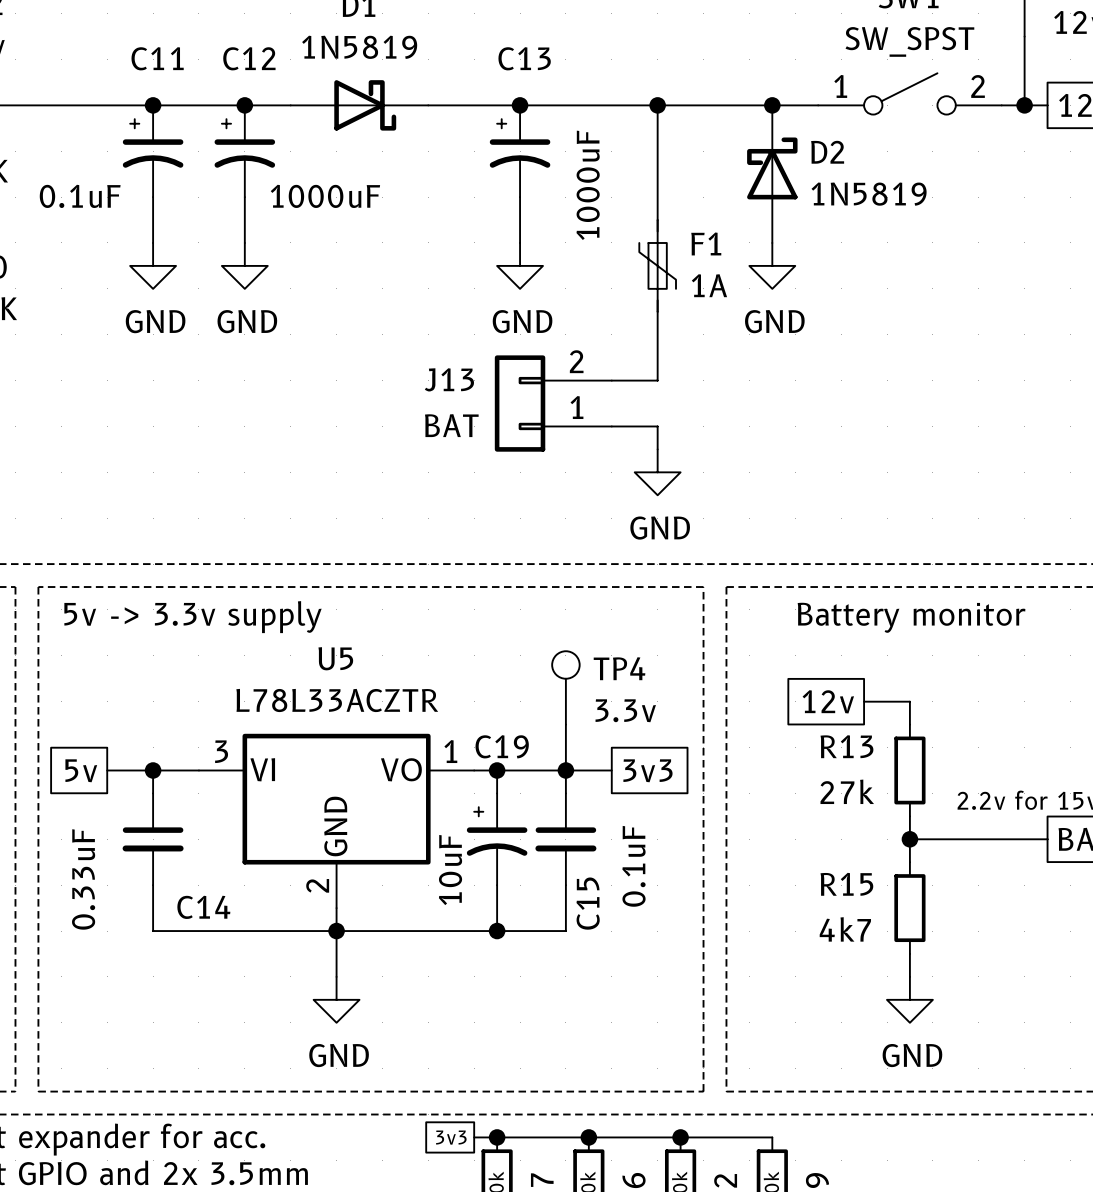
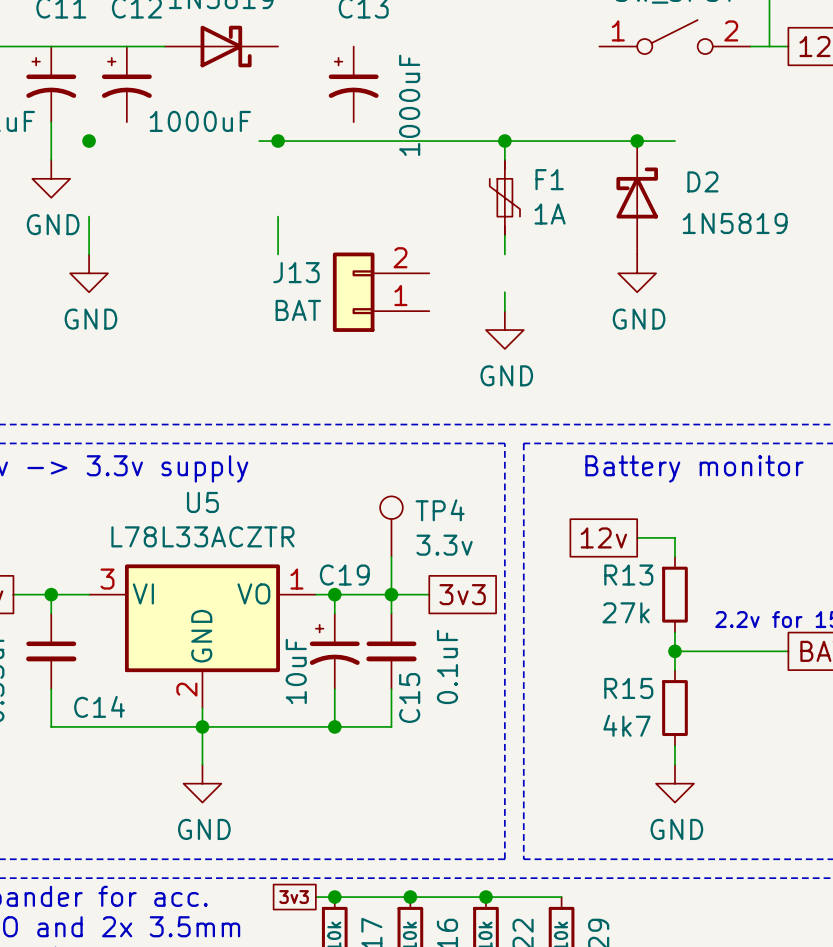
junction: (153, 105) -> none
junction: (244, 105) -> none
wire: (428, 105) (818, 105) -> none
junction: (520, 105) -> none
wire: (657, 105) (657, 220) -> none
junction: (657, 105) -> none
junction: (772, 105) -> none
junction: (1024, 105) -> none
D2 name position: D2 (827, 152) -> D2 (702, 181)
D2 position: (772, 174) -> (637, 197)
D2 value position: 1N5819 (869, 194) -> 1N5819 (735, 223)
wire: (244, 197) (244, 242) -> (89, 216) (89, 254)
wire: (520, 197) (520, 242) -> (278, 216) (278, 254)
junction: none -> (89, 141)
wire: none -> (259, 141) (674, 141)
junction: none -> (278, 141)
wire: none -> (504, 141) (504, 159)
junction: none -> (504, 141)
junction: none -> (637, 141)
power symbol position: GND (244, 265) -> GND (89, 273)
power symbol: GND (520, 265) -> none
F1 position: (657, 265) -> (504, 197)
power symbol: GND (772, 265) -> none
wire: (657, 311) (657, 380) (611, 380) -> none
wire: none -> (504, 235) (504, 254)
power symbol: none -> GND (637, 273)
wire: none -> (504, 292) (504, 311)
wire: (611, 426) (657, 426) (657, 449) -> none
power symbol position: GND (657, 472) -> GND (504, 330)

